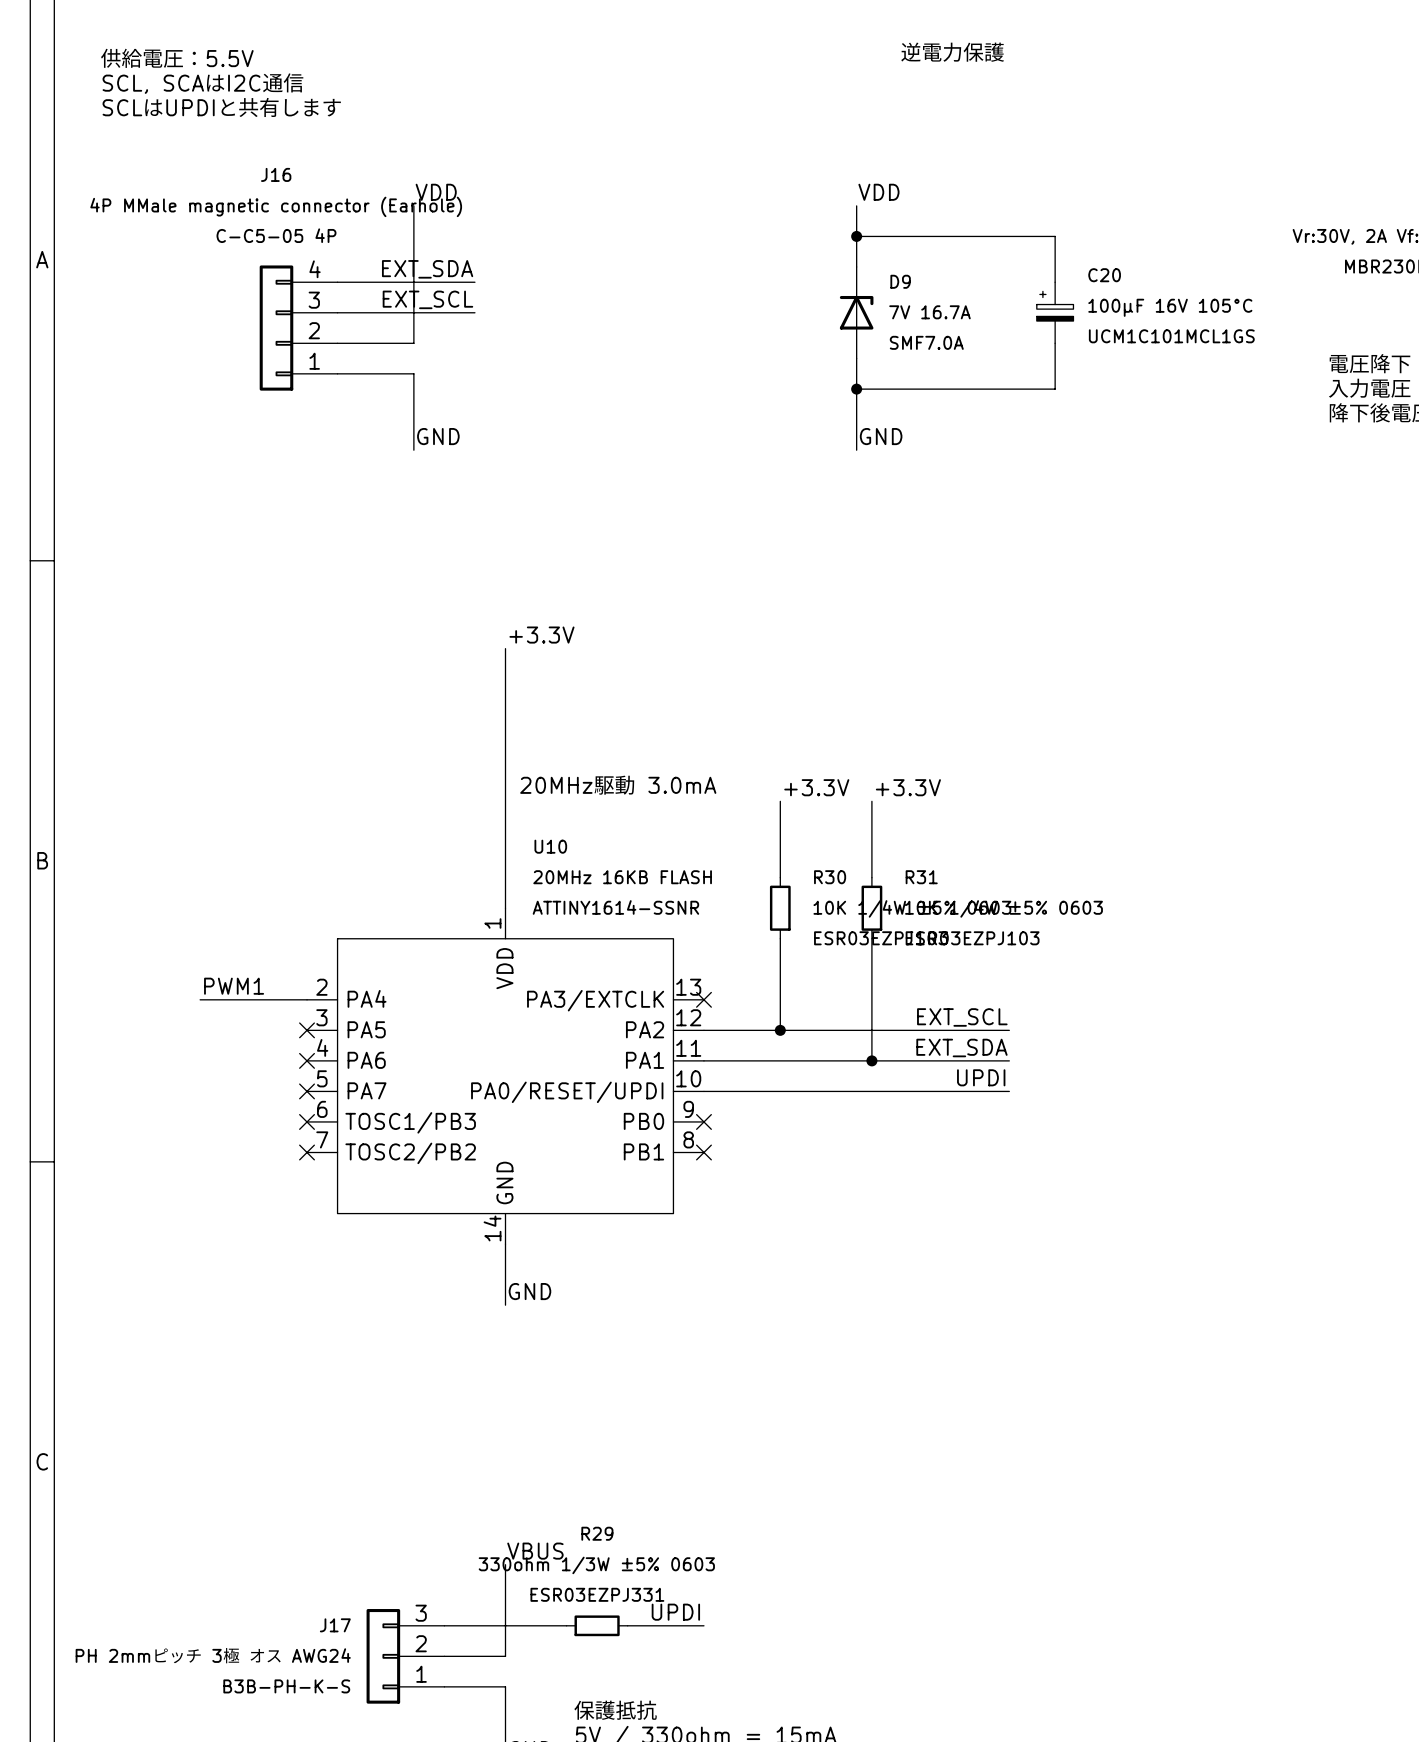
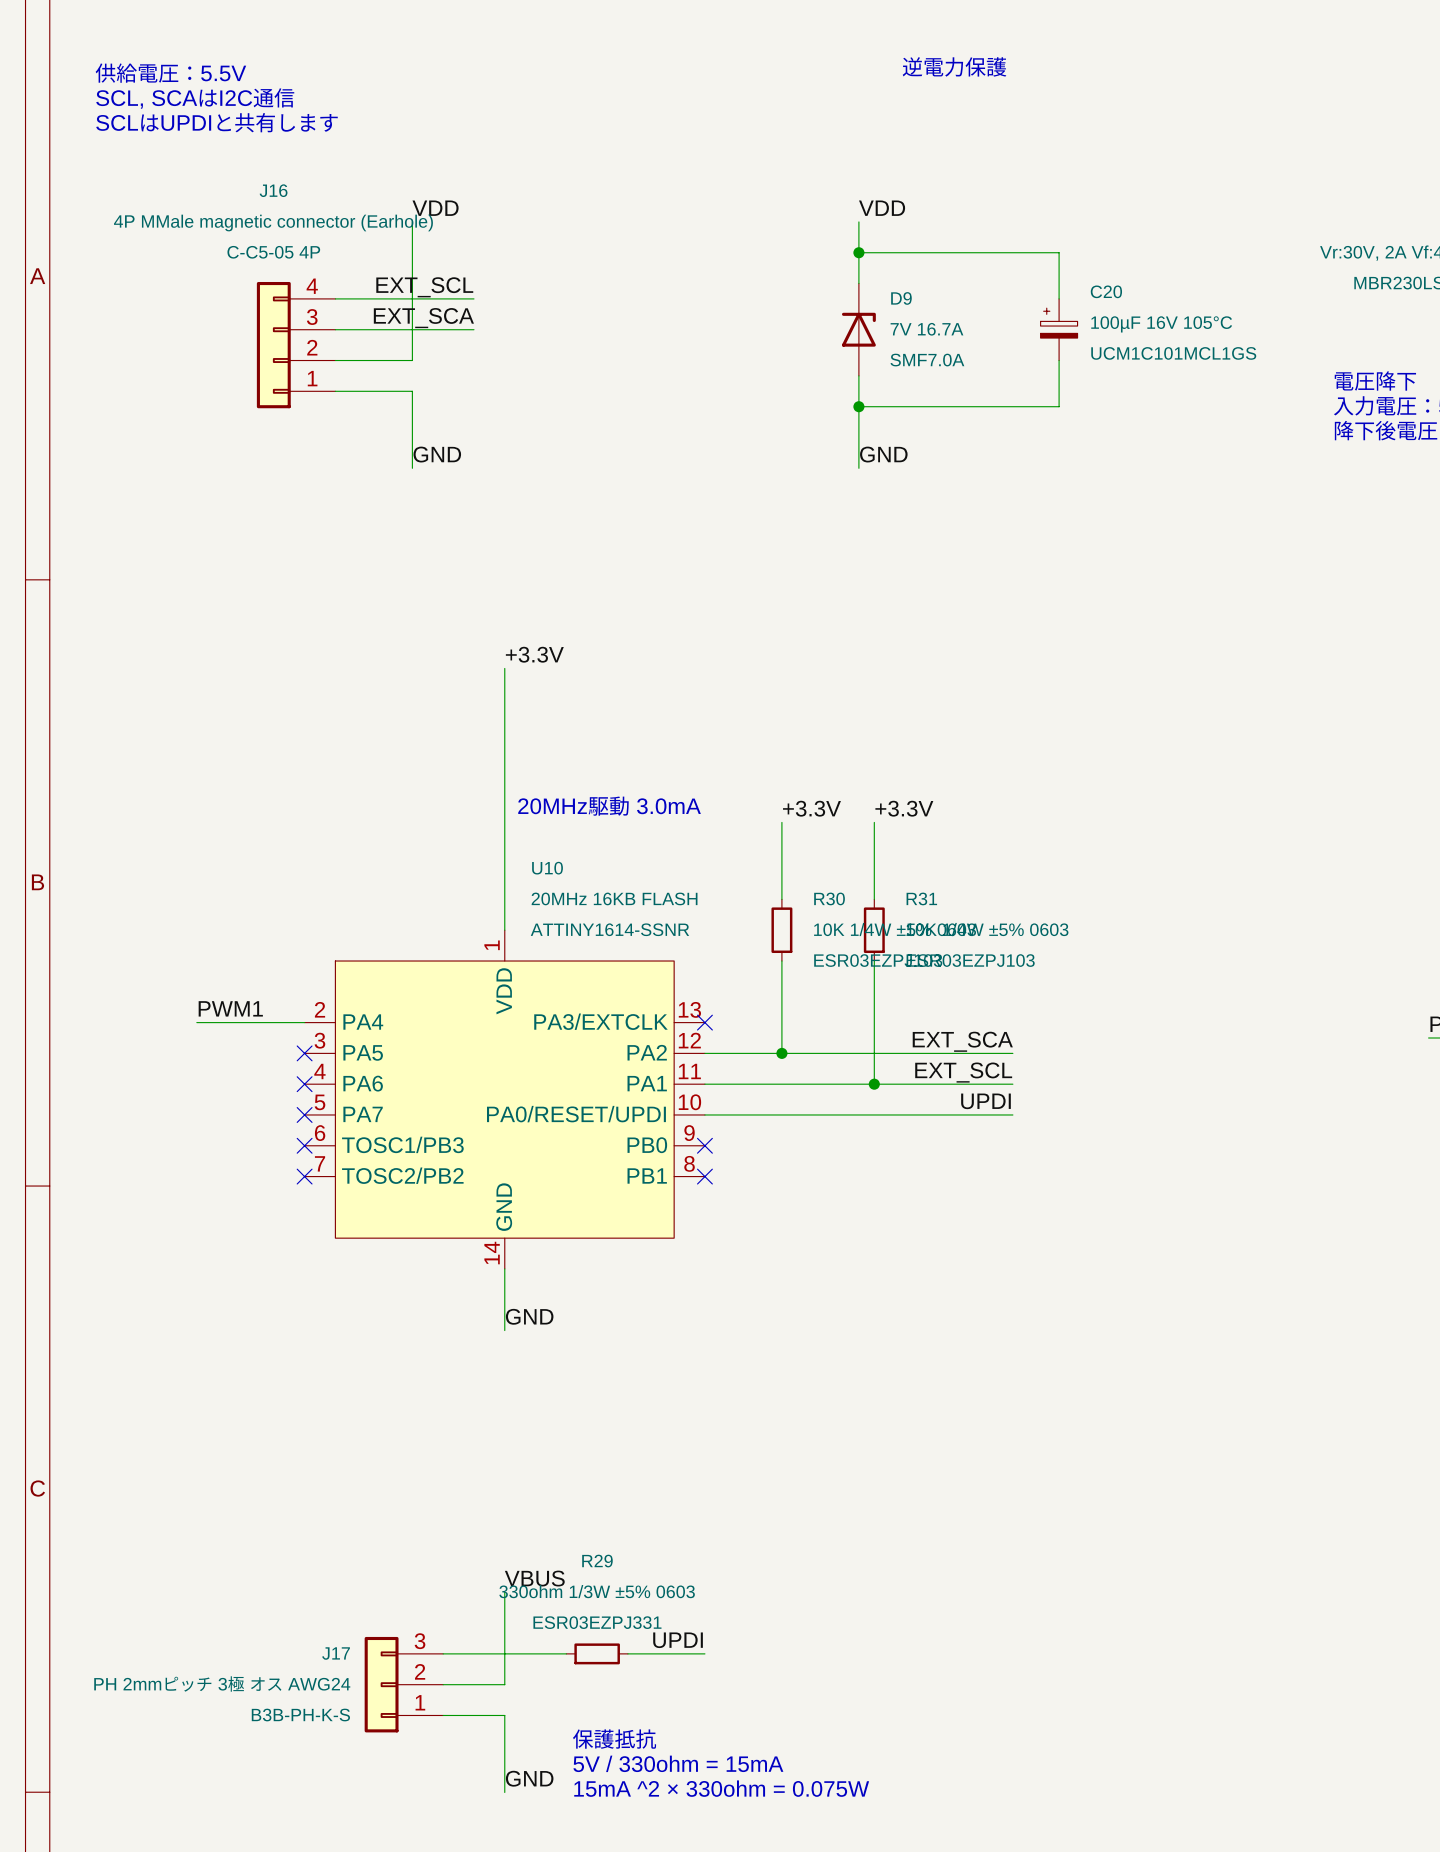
label: EXT_SDA (427, 269) -> EXT_SCL (424, 287)
label: EXT_SCL (427, 299) -> EXT_SCA (423, 318)
label: EXT_SCL (962, 1017) -> EXT_SCA (962, 1041)
label: EXT_SDA (961, 1048) -> EXT_SCL (963, 1072)

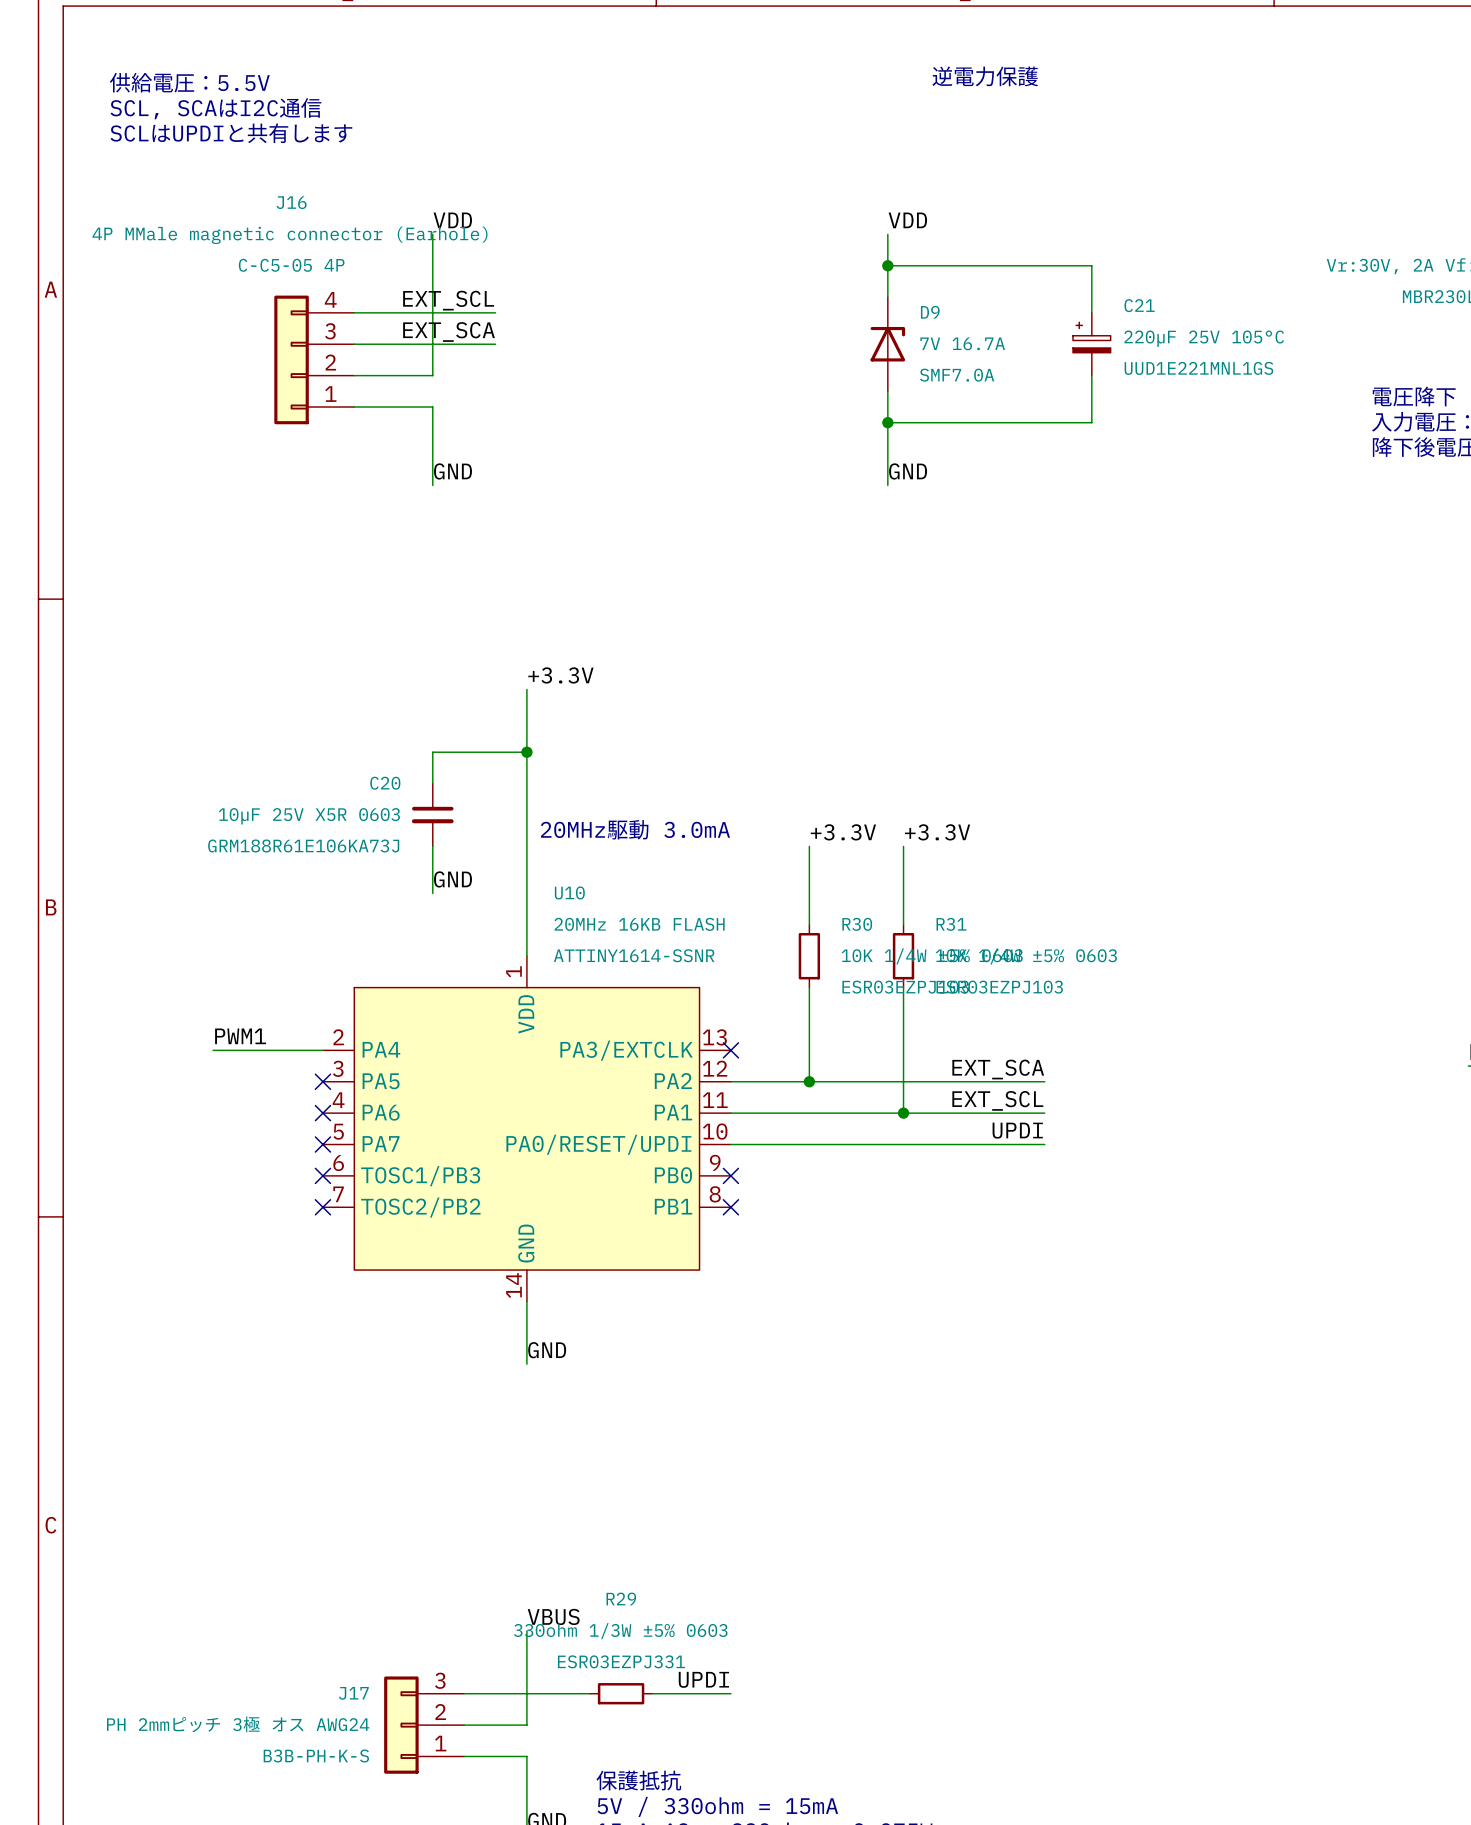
C20 name: C20 (1106, 291) -> C21 (1139, 305)
C20 value: 100µF 16V 105°C (1161, 324) -> 220µF 25V 105°C (1204, 338)
C20 text: UCM1C101MCL1GS (1173, 353) -> UUD1E221MNL1GS (1198, 368)
wire: none -> (526, 752) (432, 752) (432, 783)
junction: none -> (526, 752)
C20: none -> 10µF 25V X5R 0603 (432, 814)
wire: none -> (432, 846) (432, 893)
label: none -> GND (453, 879)

